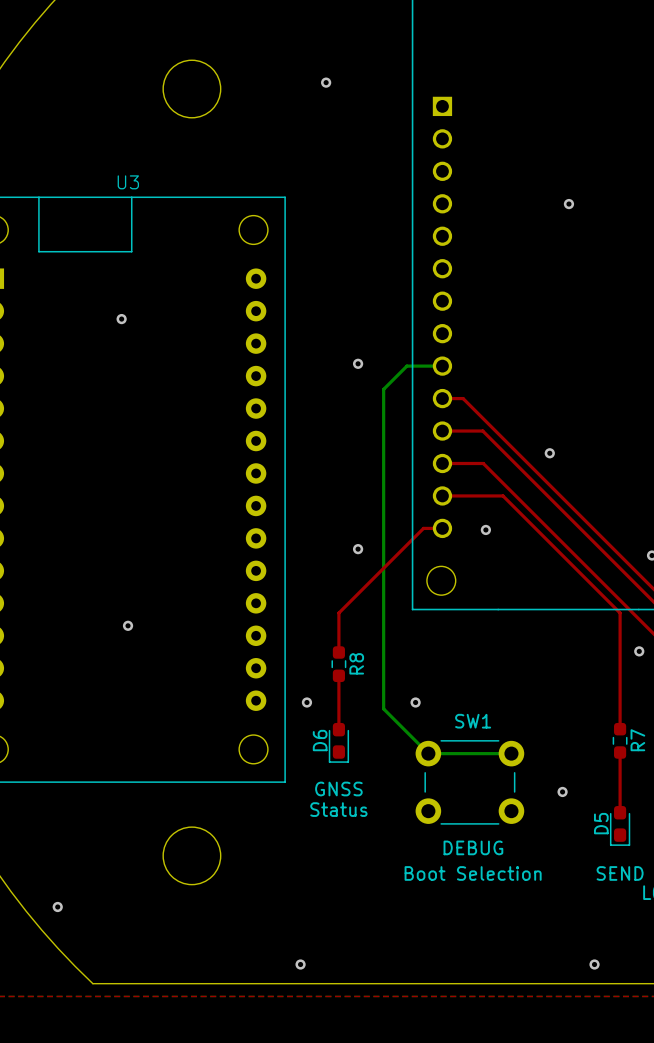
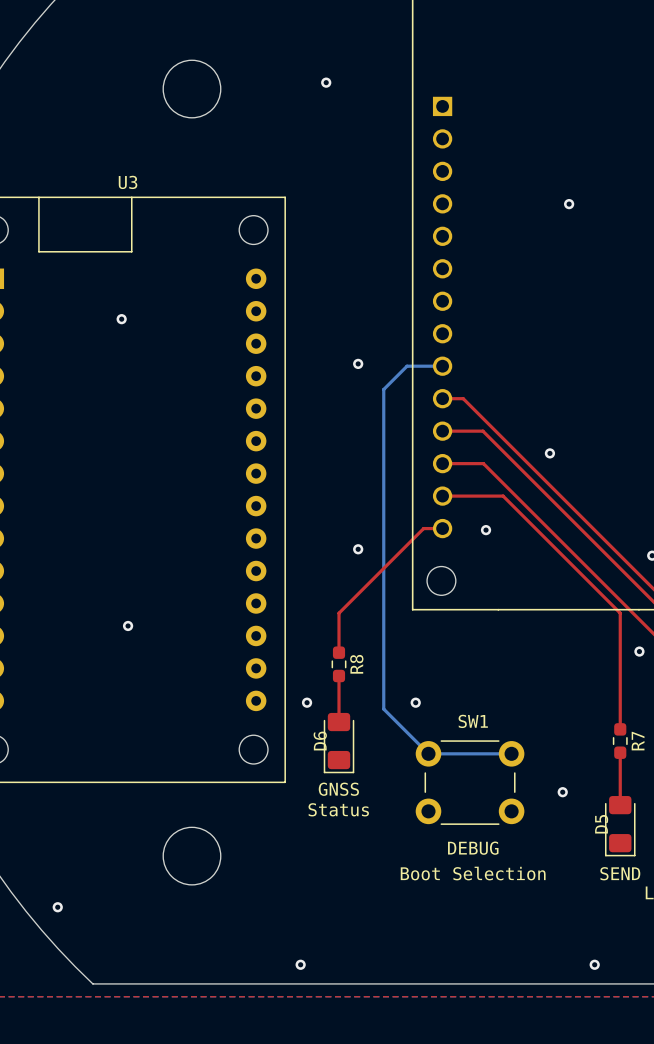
D6 footprint: [328, 722, 350, 763] -> [323, 712, 355, 774]
D5 footprint: [609, 806, 631, 846] -> [604, 796, 636, 857]

